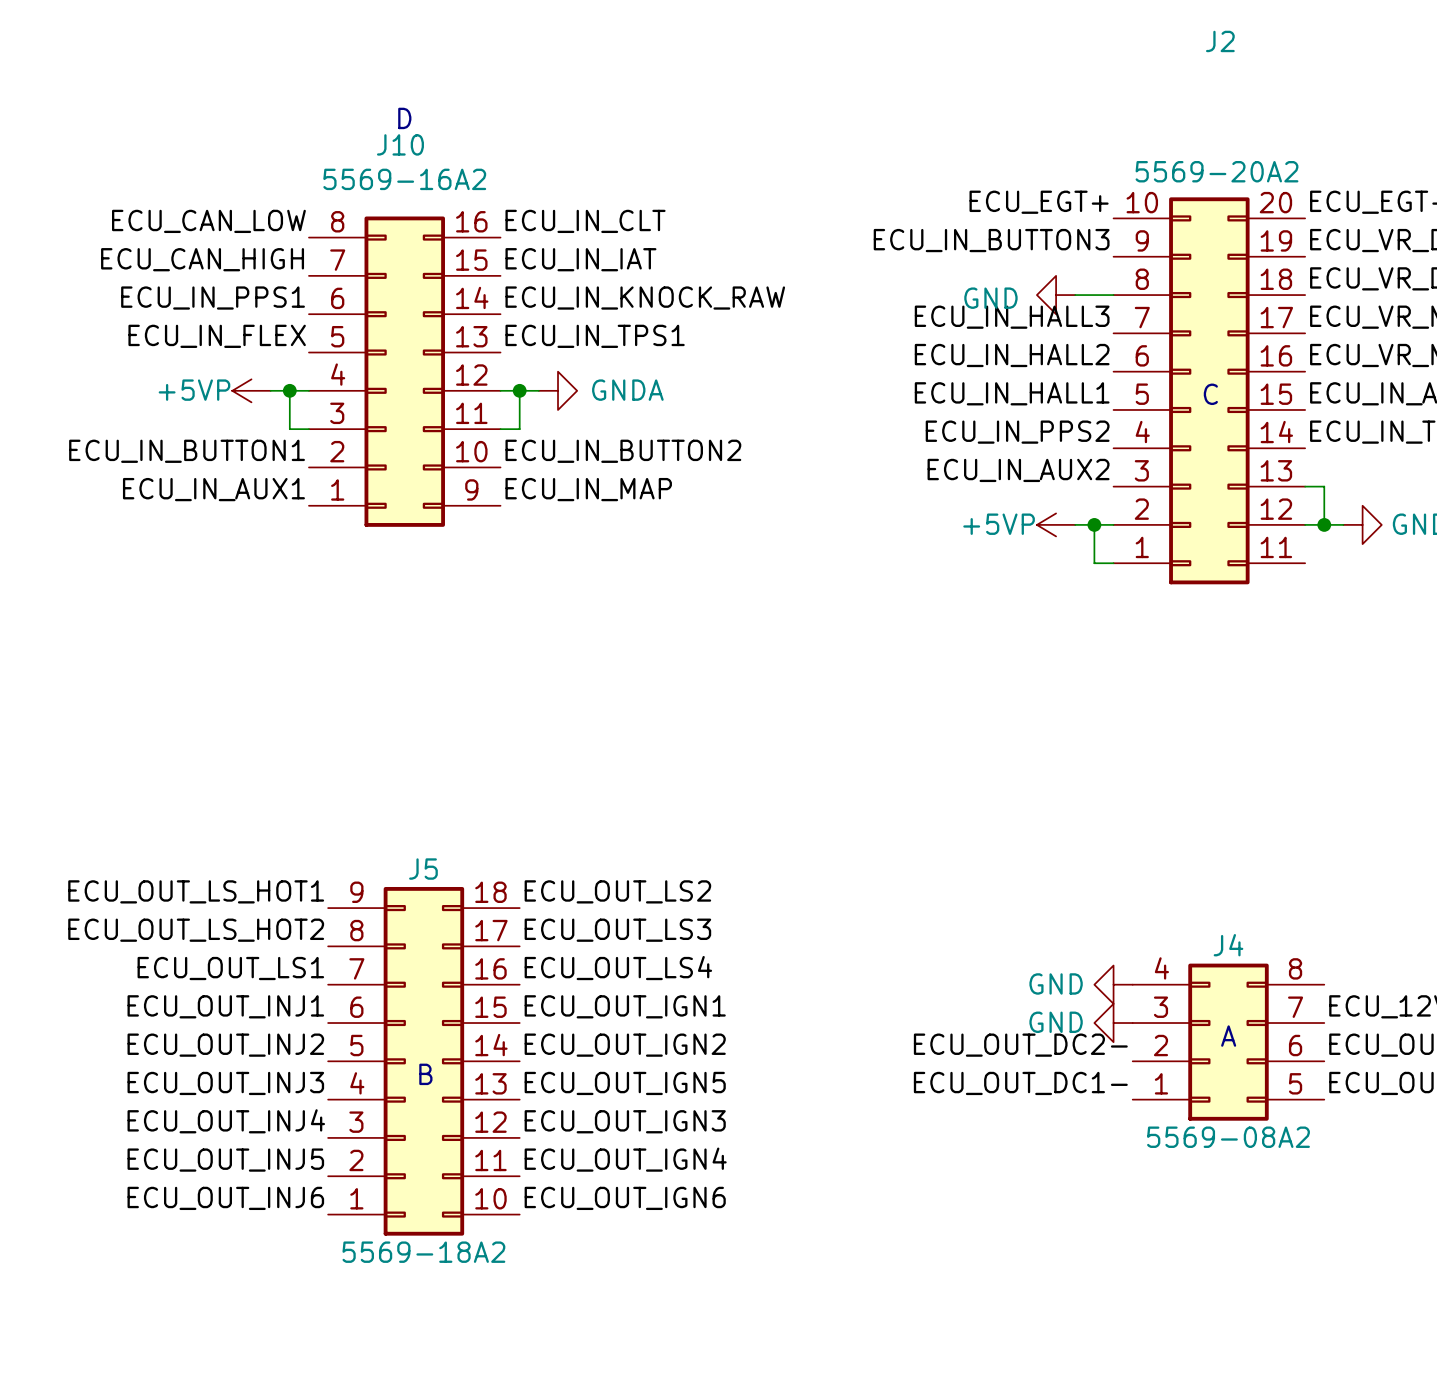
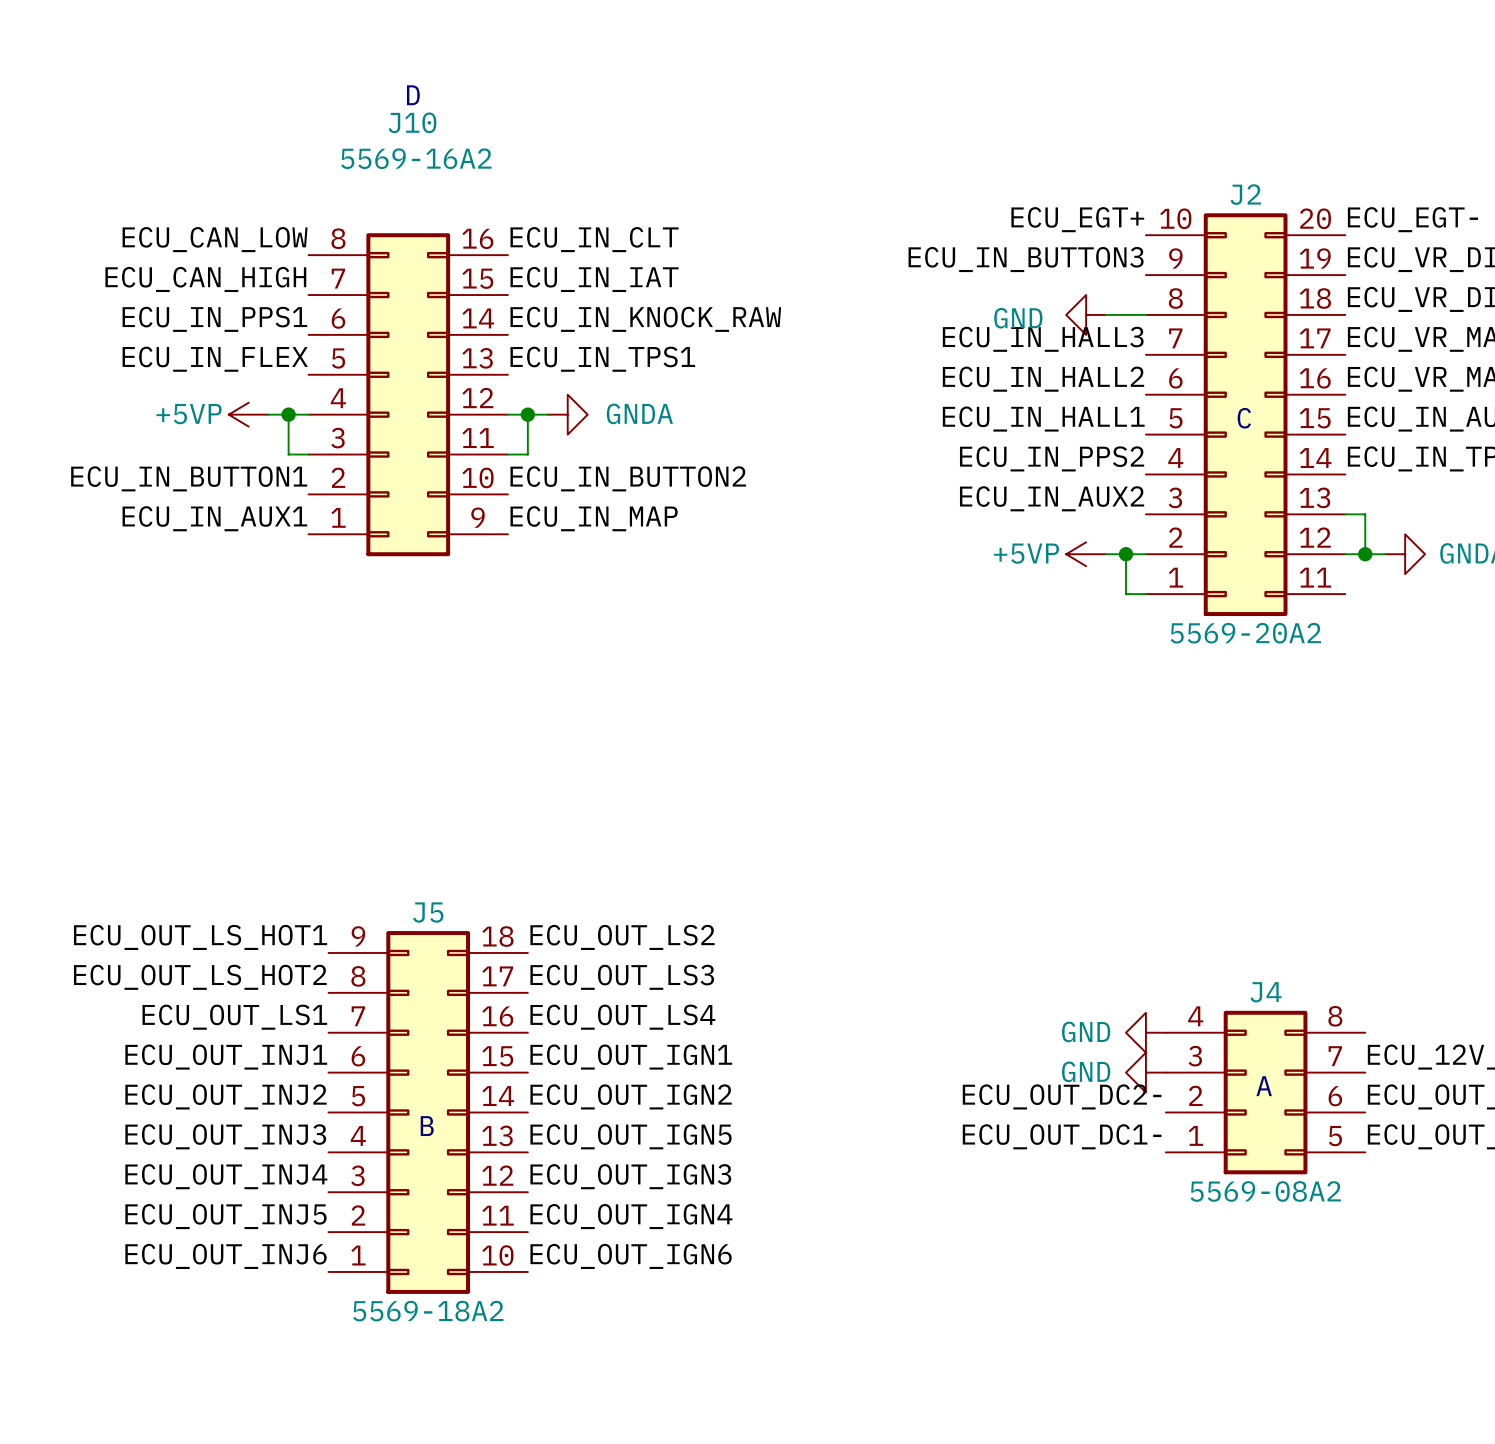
J2 name position: J2 (1220, 41) -> J2 (1245, 194)
text position: D (404, 118) -> D (413, 95)
J10 name position: J10 (400, 144) -> J10 (412, 122)
J2 value position: 5569-20A2 (1217, 171) -> 5569-20A2 (1245, 633)
J10 value position: 5569-16A2 (404, 179) -> 5569-16A2 (416, 158)

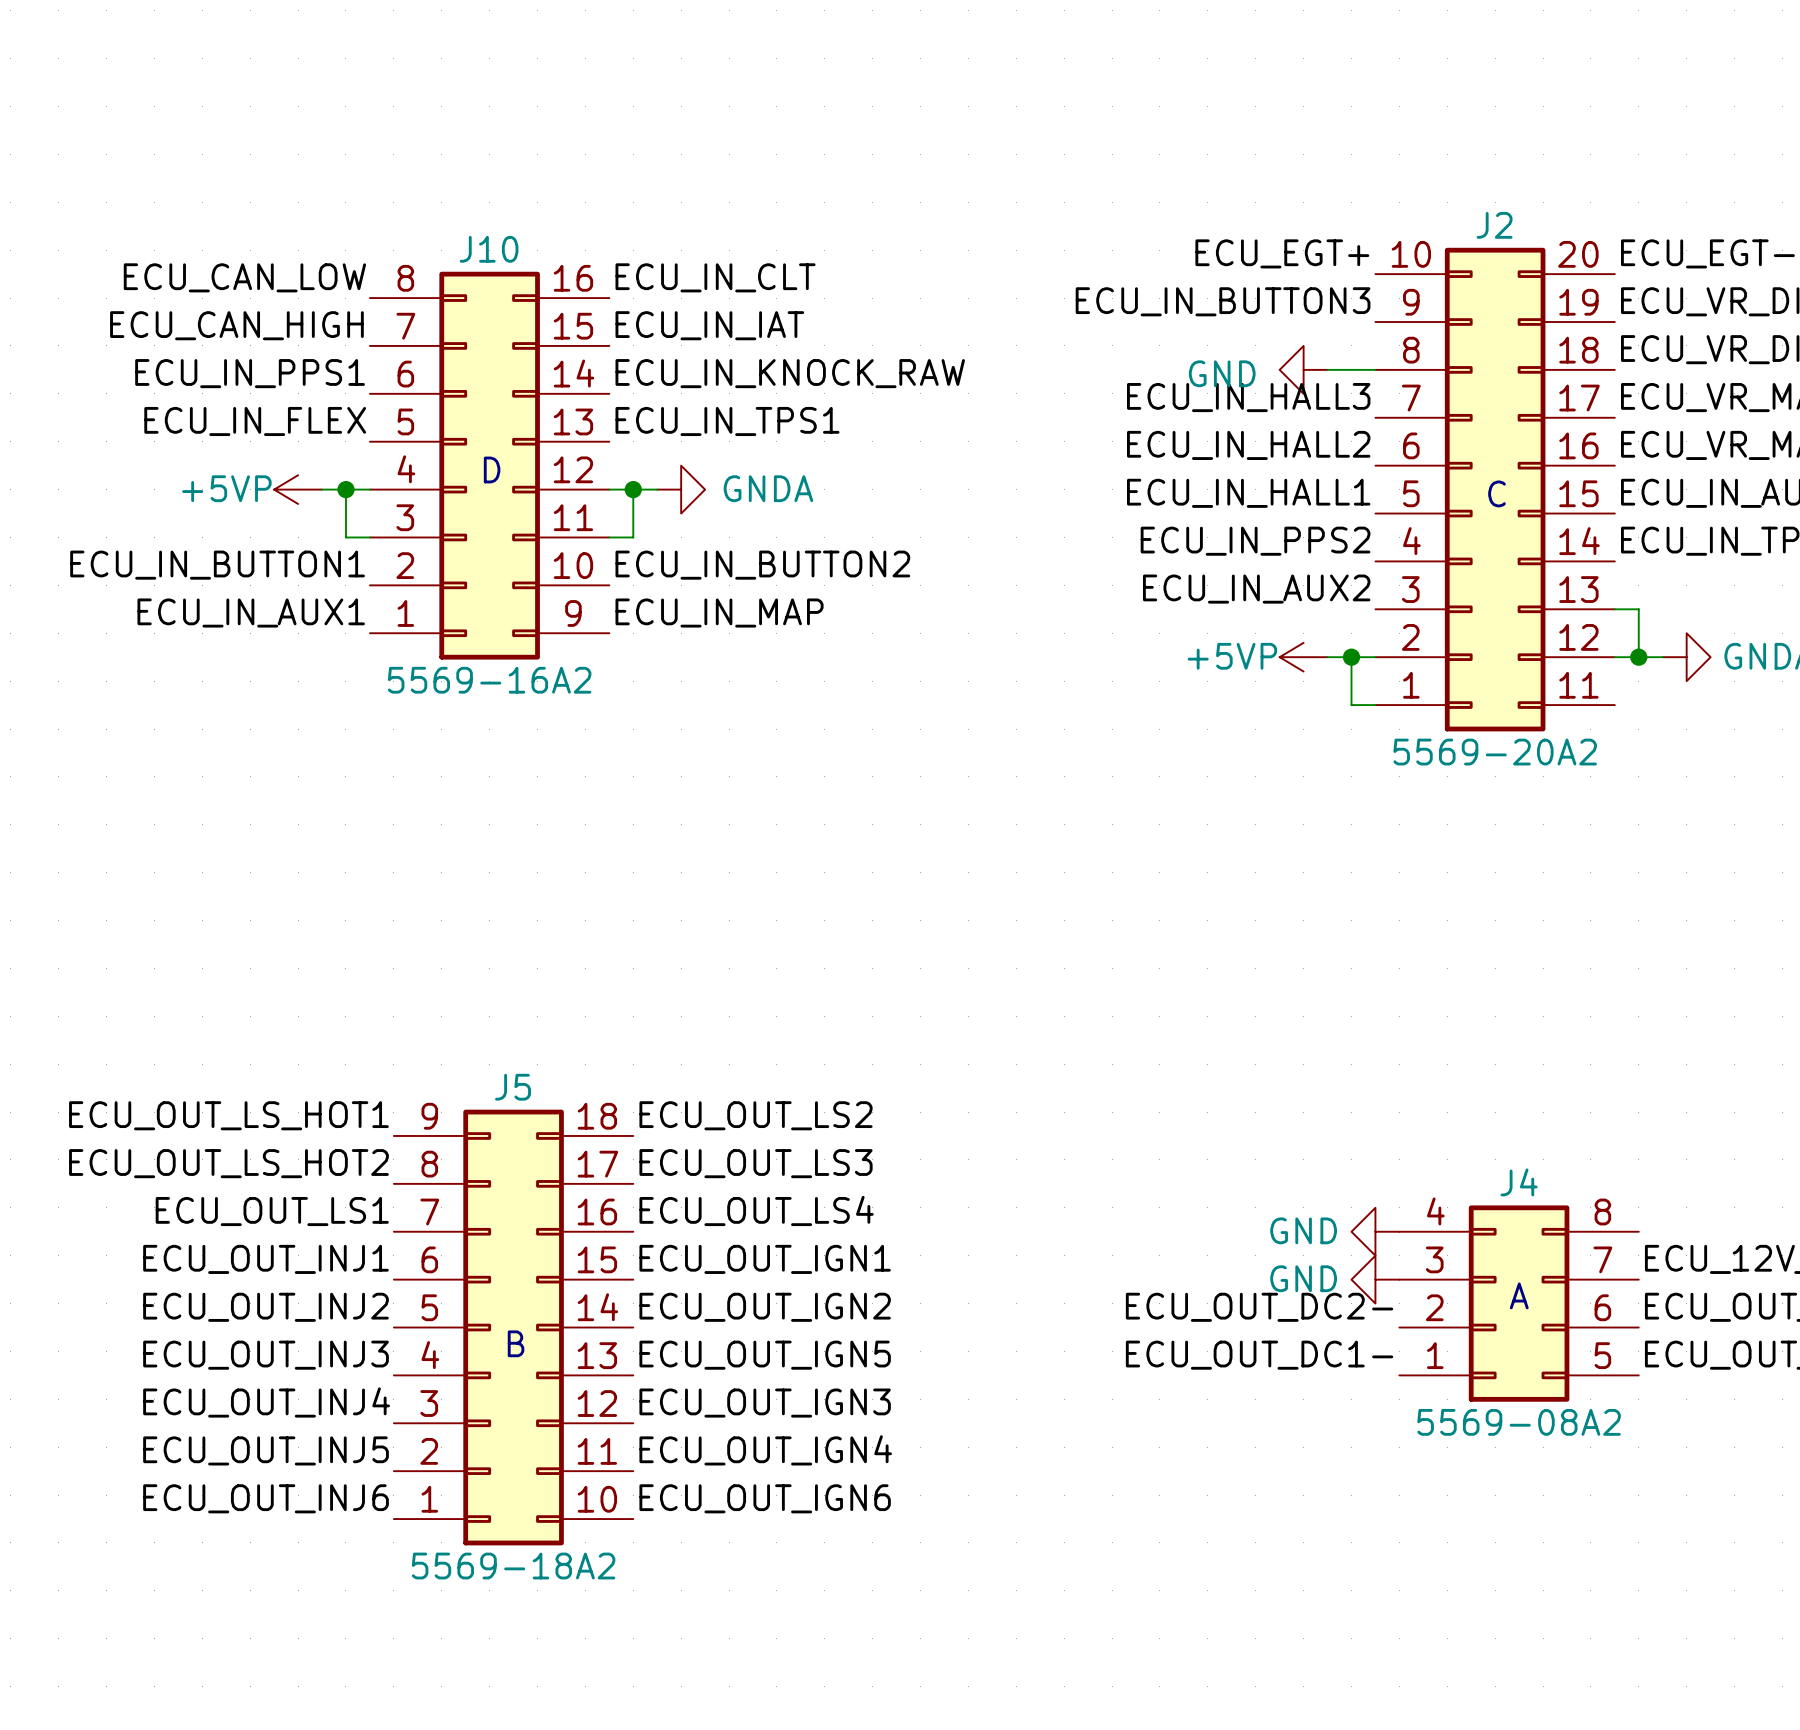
text position: D (413, 95) -> D (492, 469)
J10 name position: J10 (412, 122) -> J10 (489, 249)
J10 value position: 5569-16A2 (416, 158) -> 5569-16A2 (489, 680)

